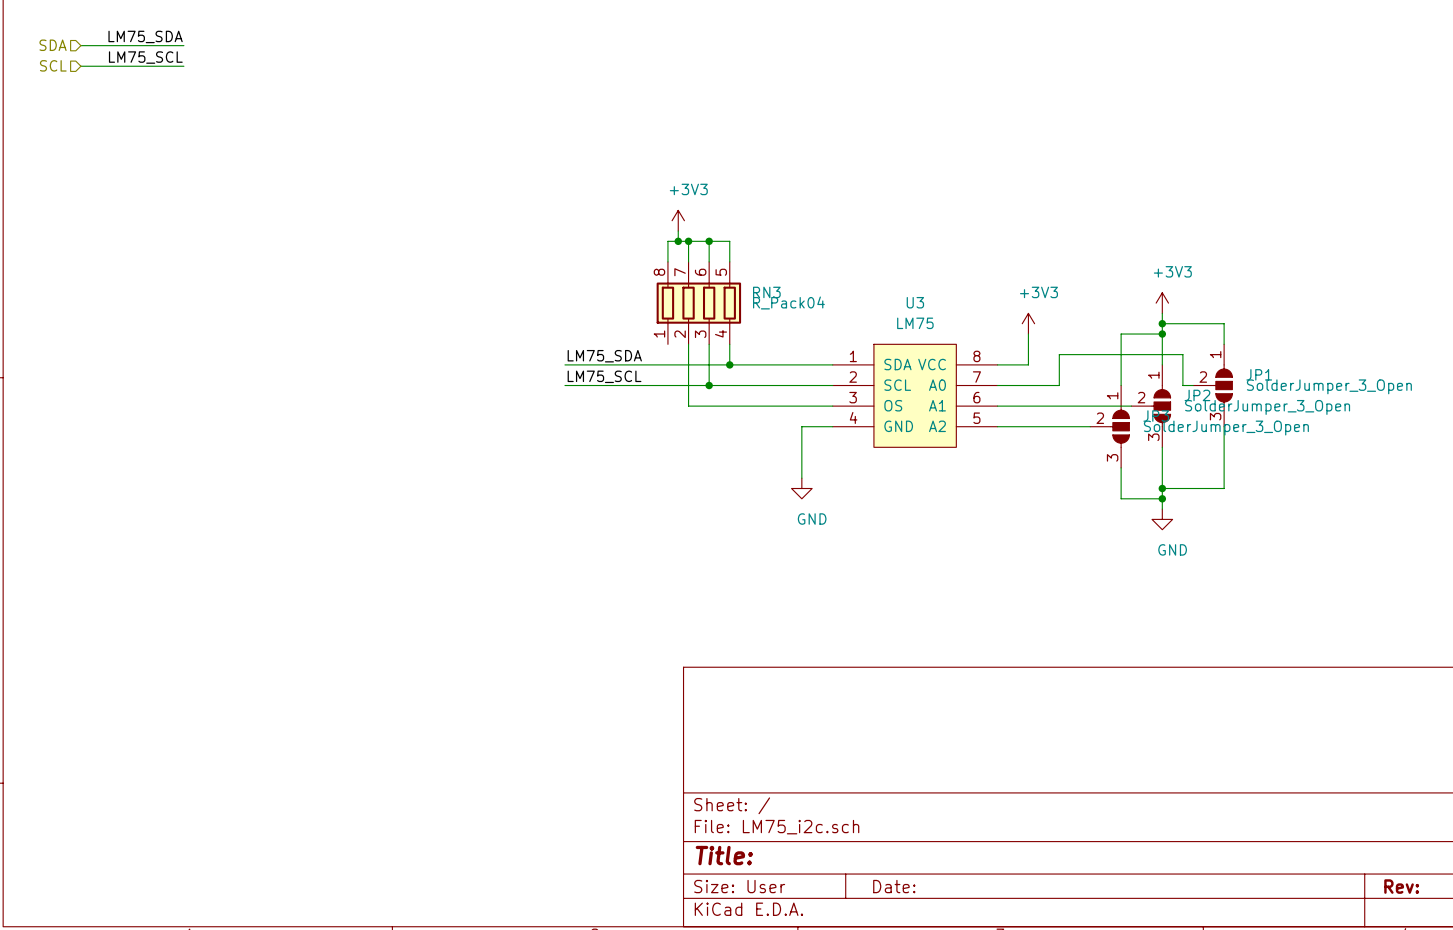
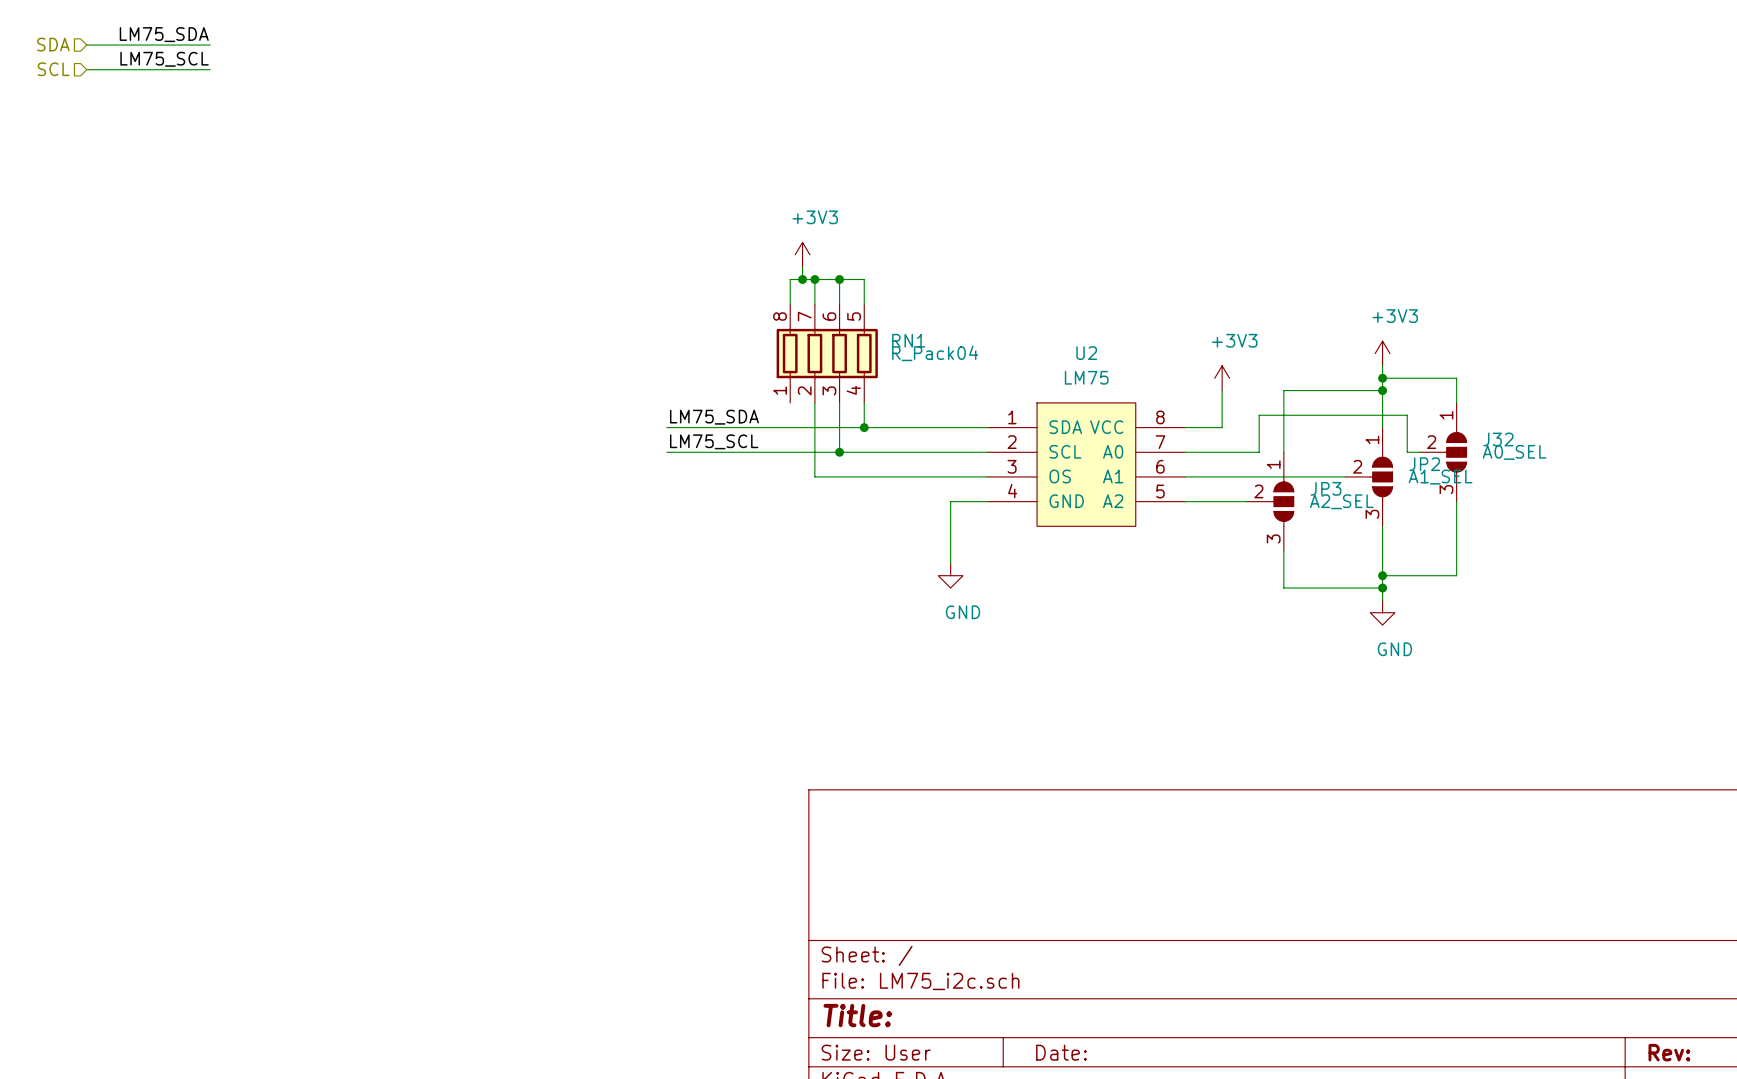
RN3 name: RN3 (766, 292) -> RN1 (908, 340)
U3 name: U3 (915, 302) -> U2 (1086, 353)
wire: (1121, 334) (1121, 385) -> (1333, 390) (1283, 390) (1283, 452)
JP1 name: JP1 (1259, 374) -> J32 (1498, 439)
JP1 value: SolderJumper_3_Open (1329, 386) -> A0_SEL (1514, 452)
JP2 value: SolderJumper_3_Open (1267, 407) -> A1_SEL (1440, 477)
JP3 position: (1109, 426) -> (1270, 501)
JP3 value: SolderJumper_3_Open (1226, 428) -> A2_SEL (1341, 501)
wire: (1121, 467) (1121, 498) -> (1283, 551) (1283, 588) (1333, 588)

